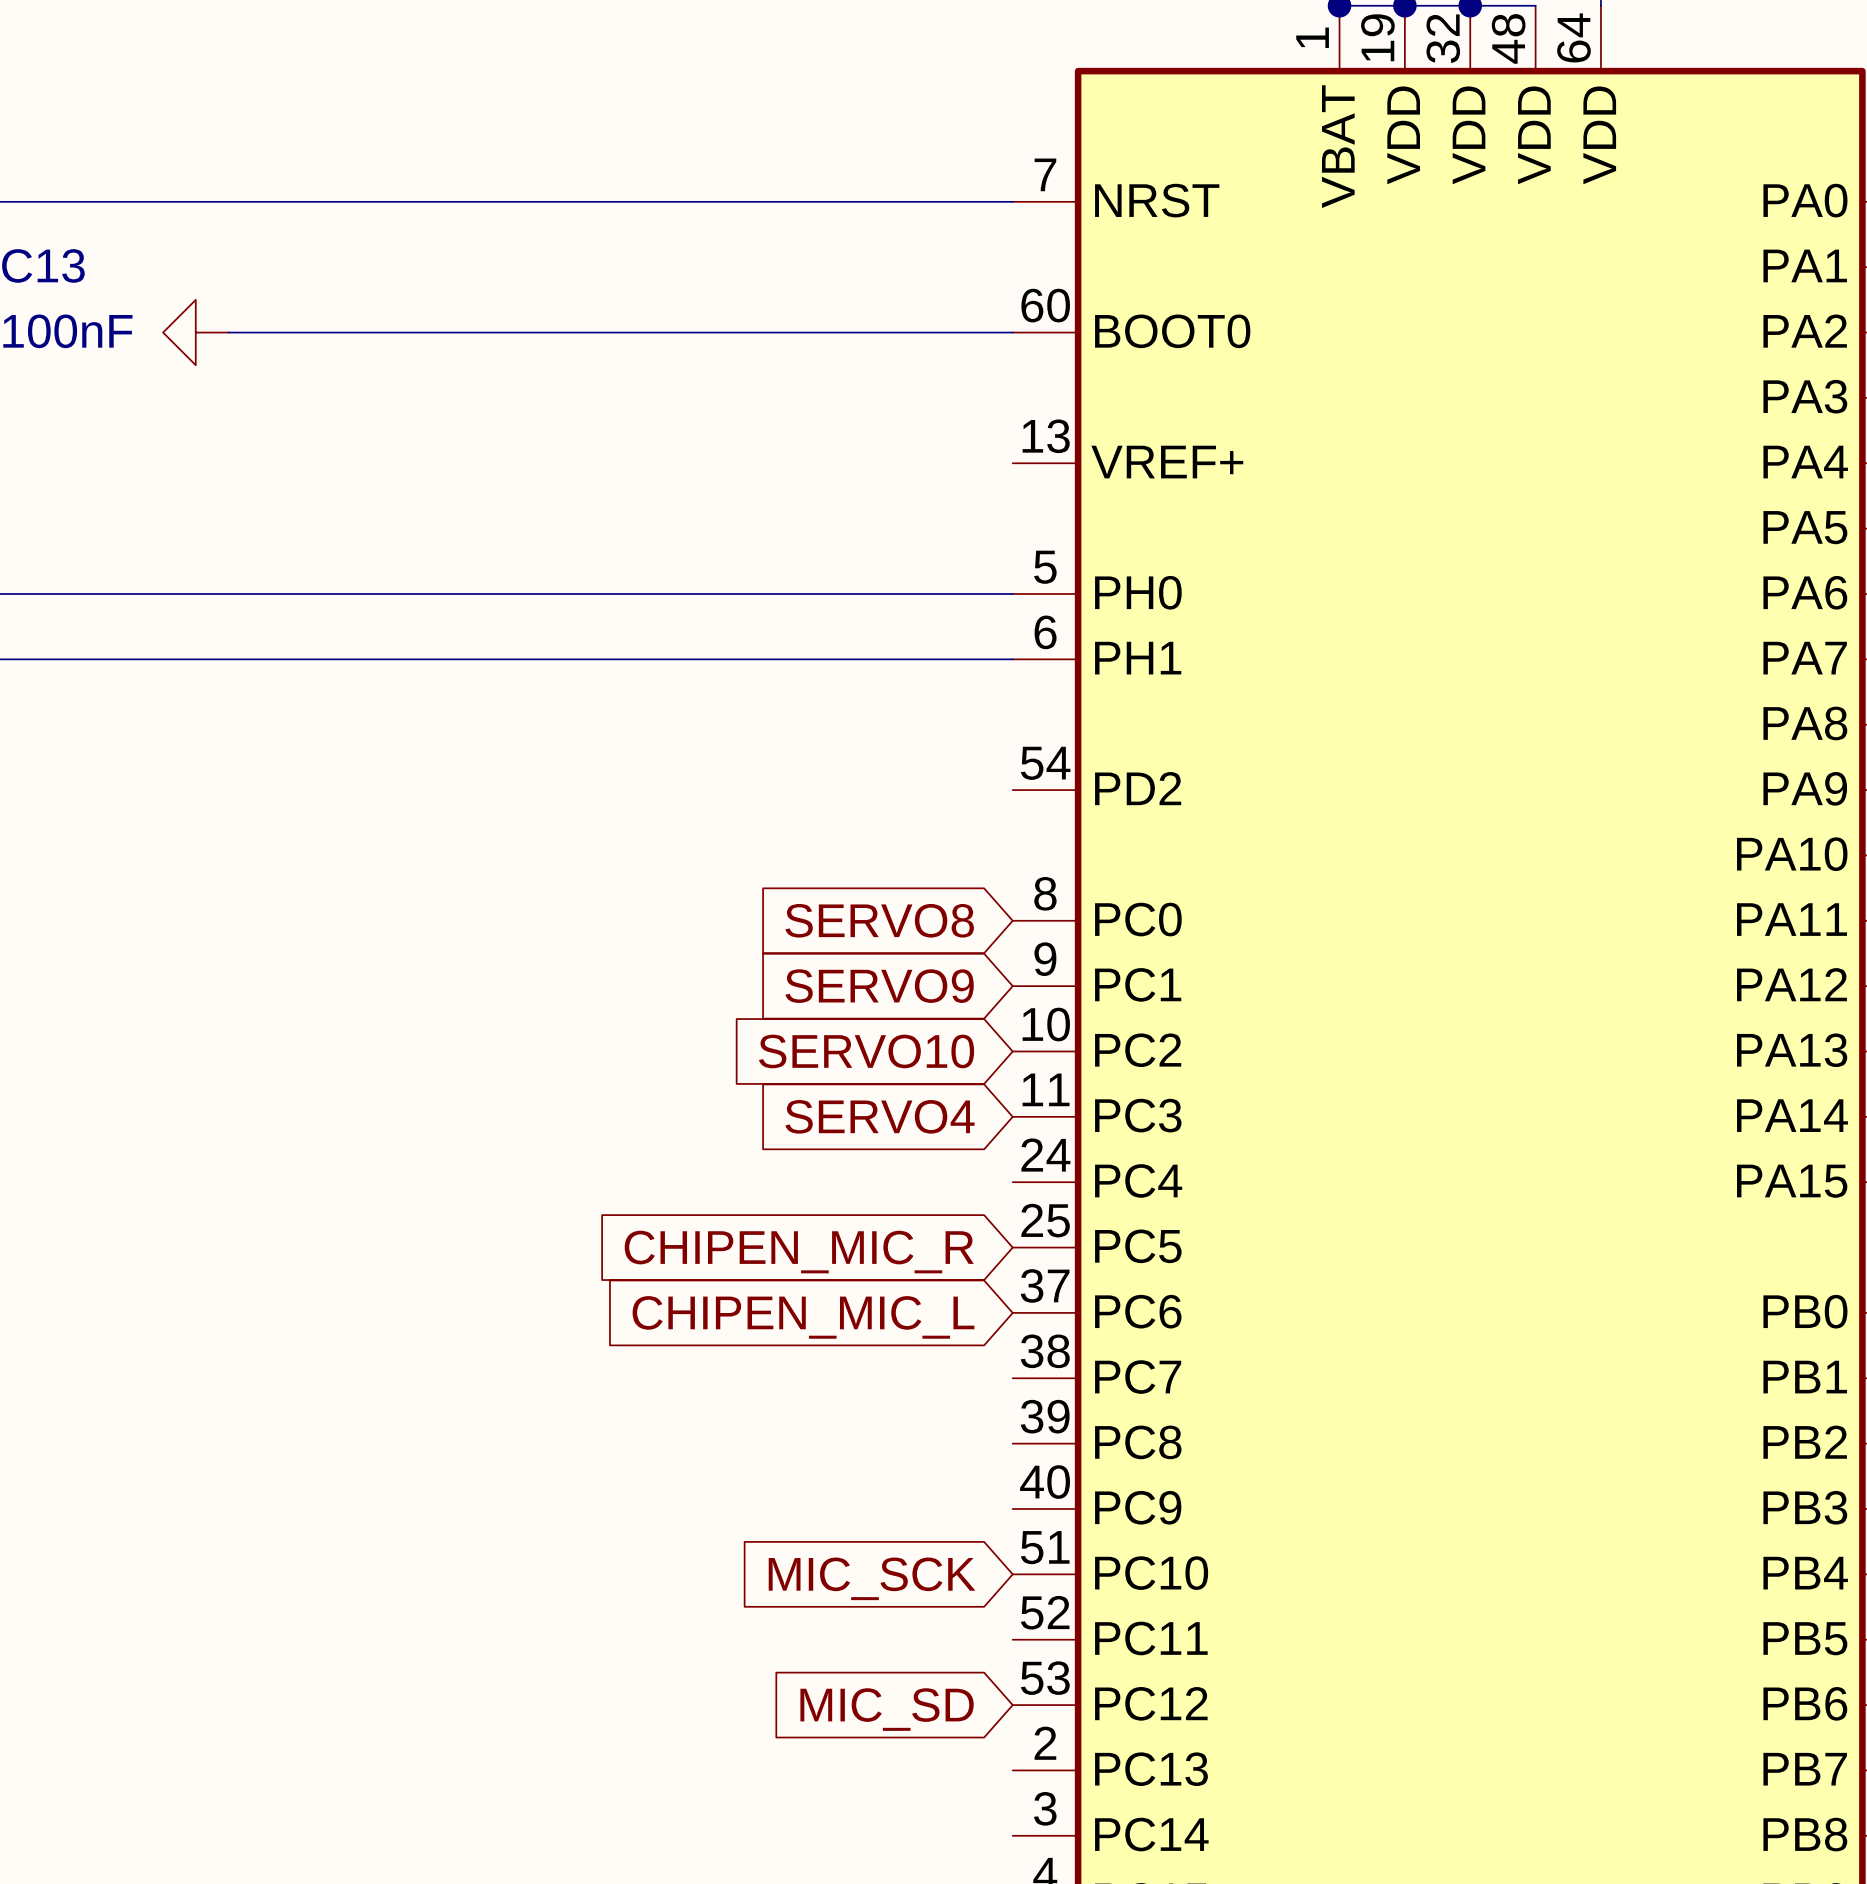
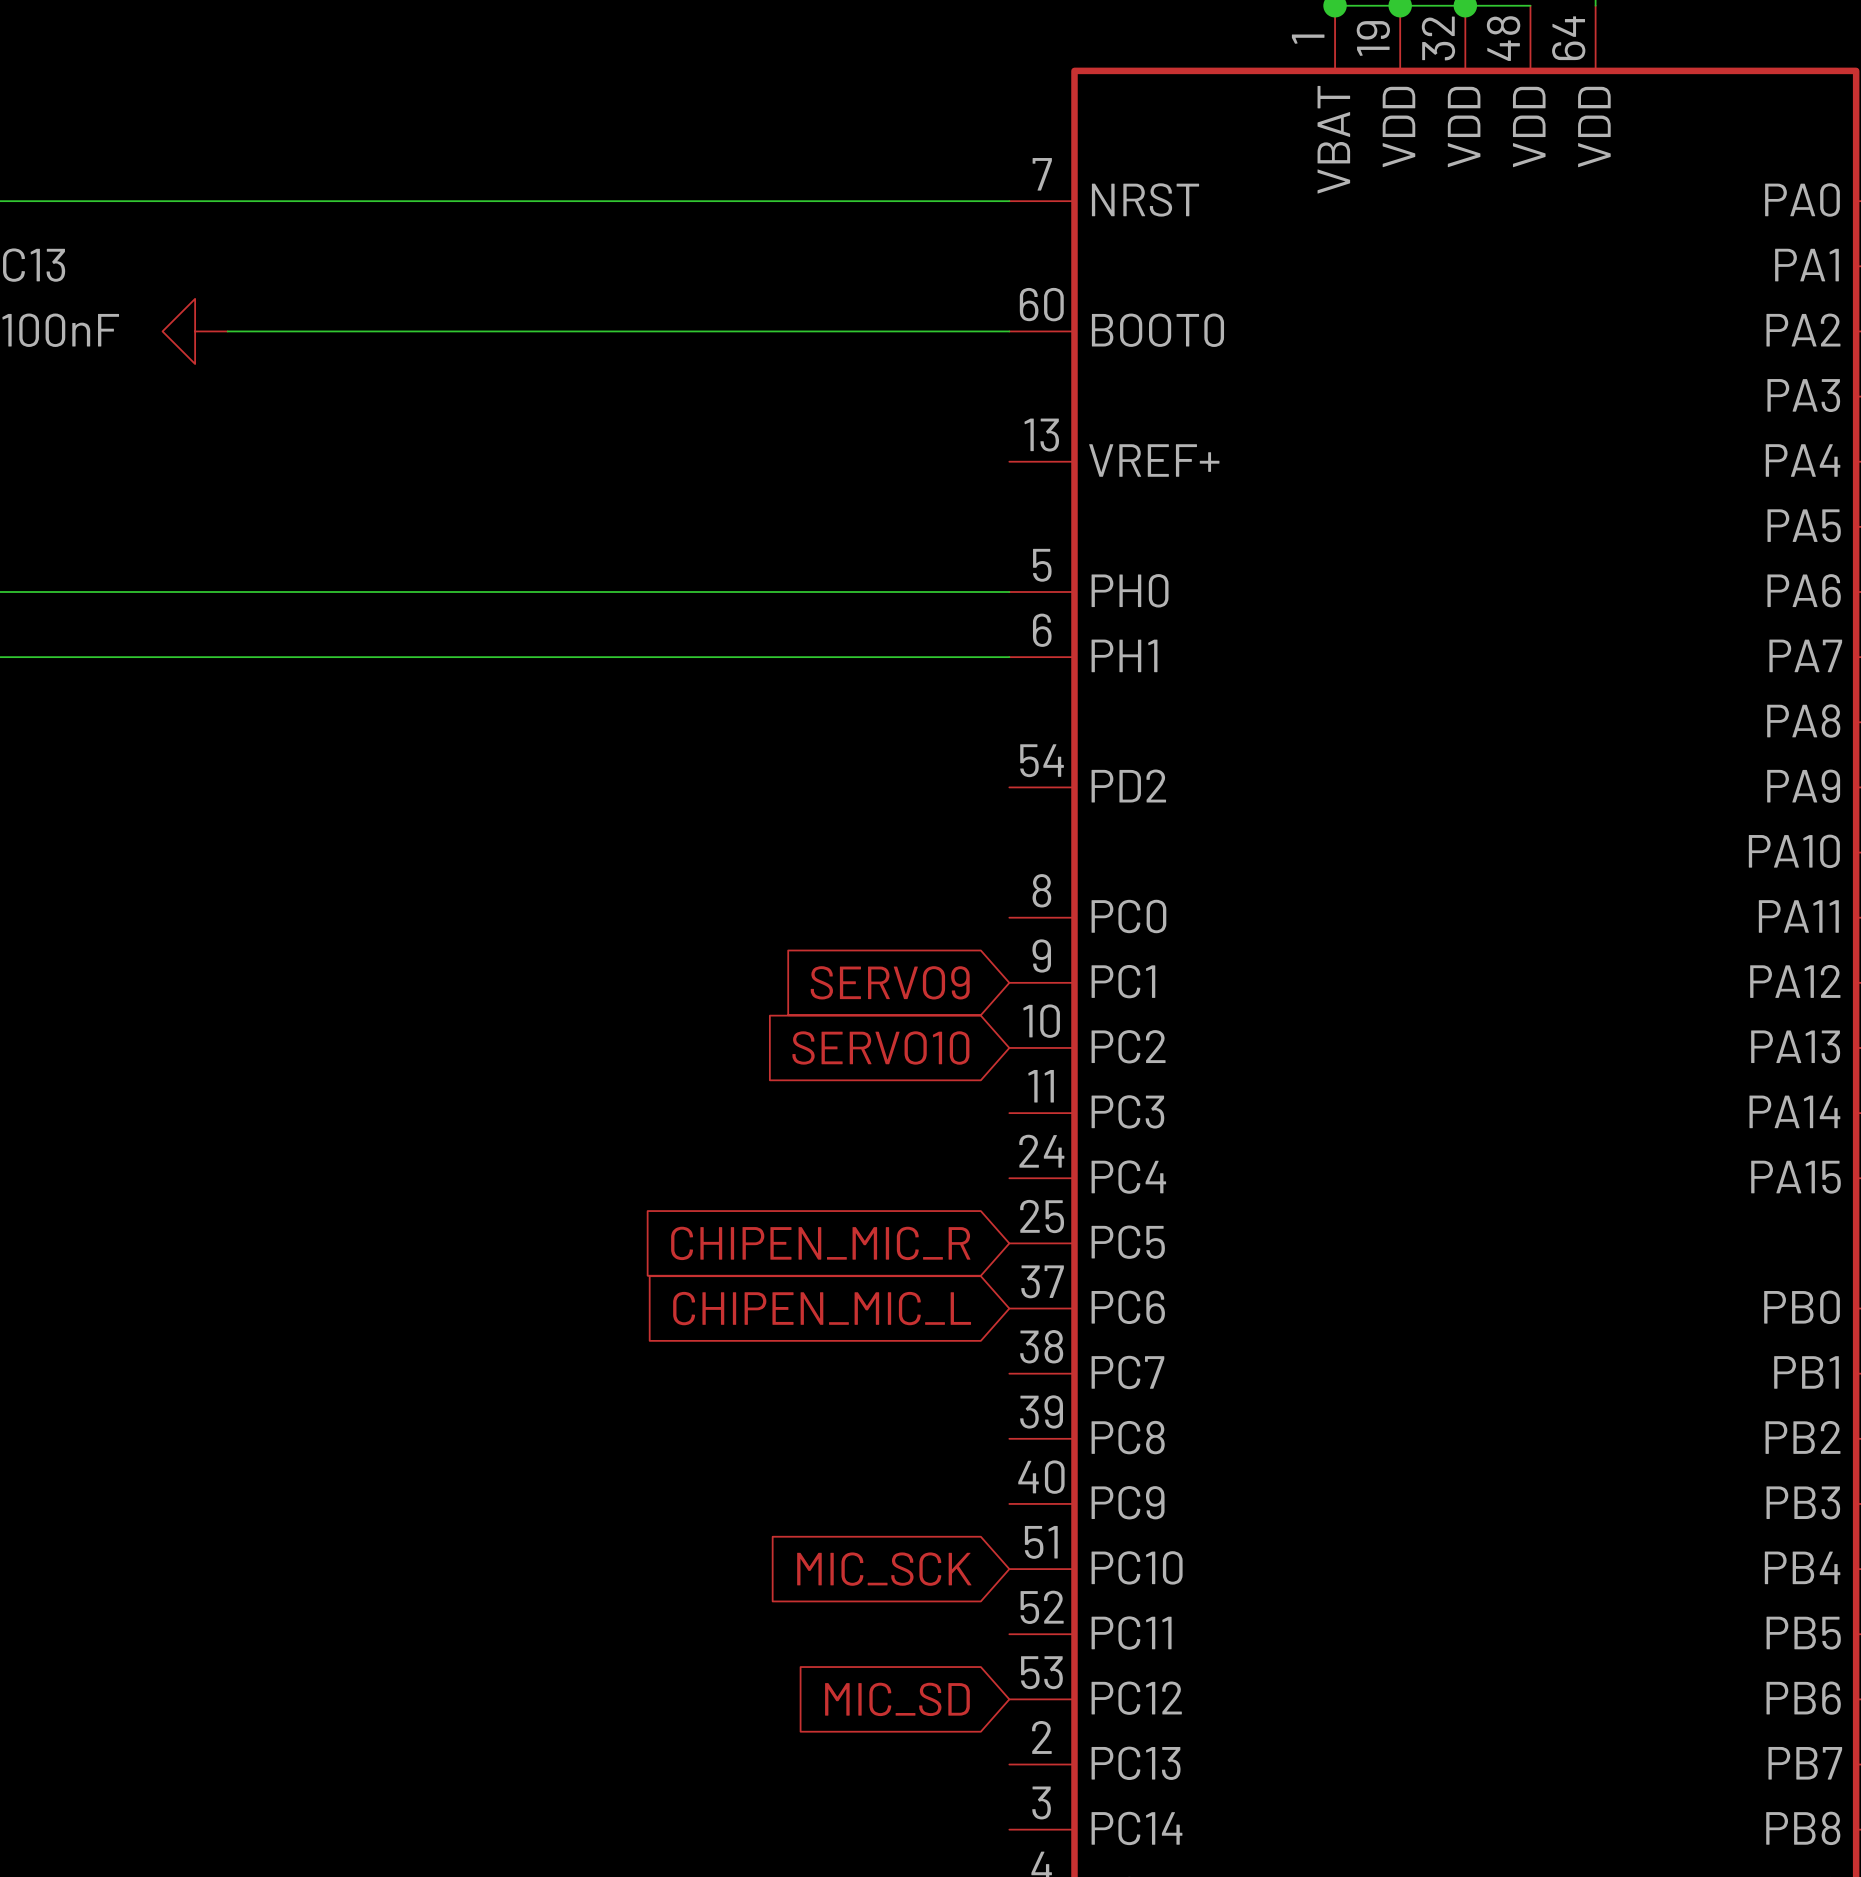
global label: SERVO8 (879, 920) -> none
global label: SERVO4 (880, 1116) -> none

